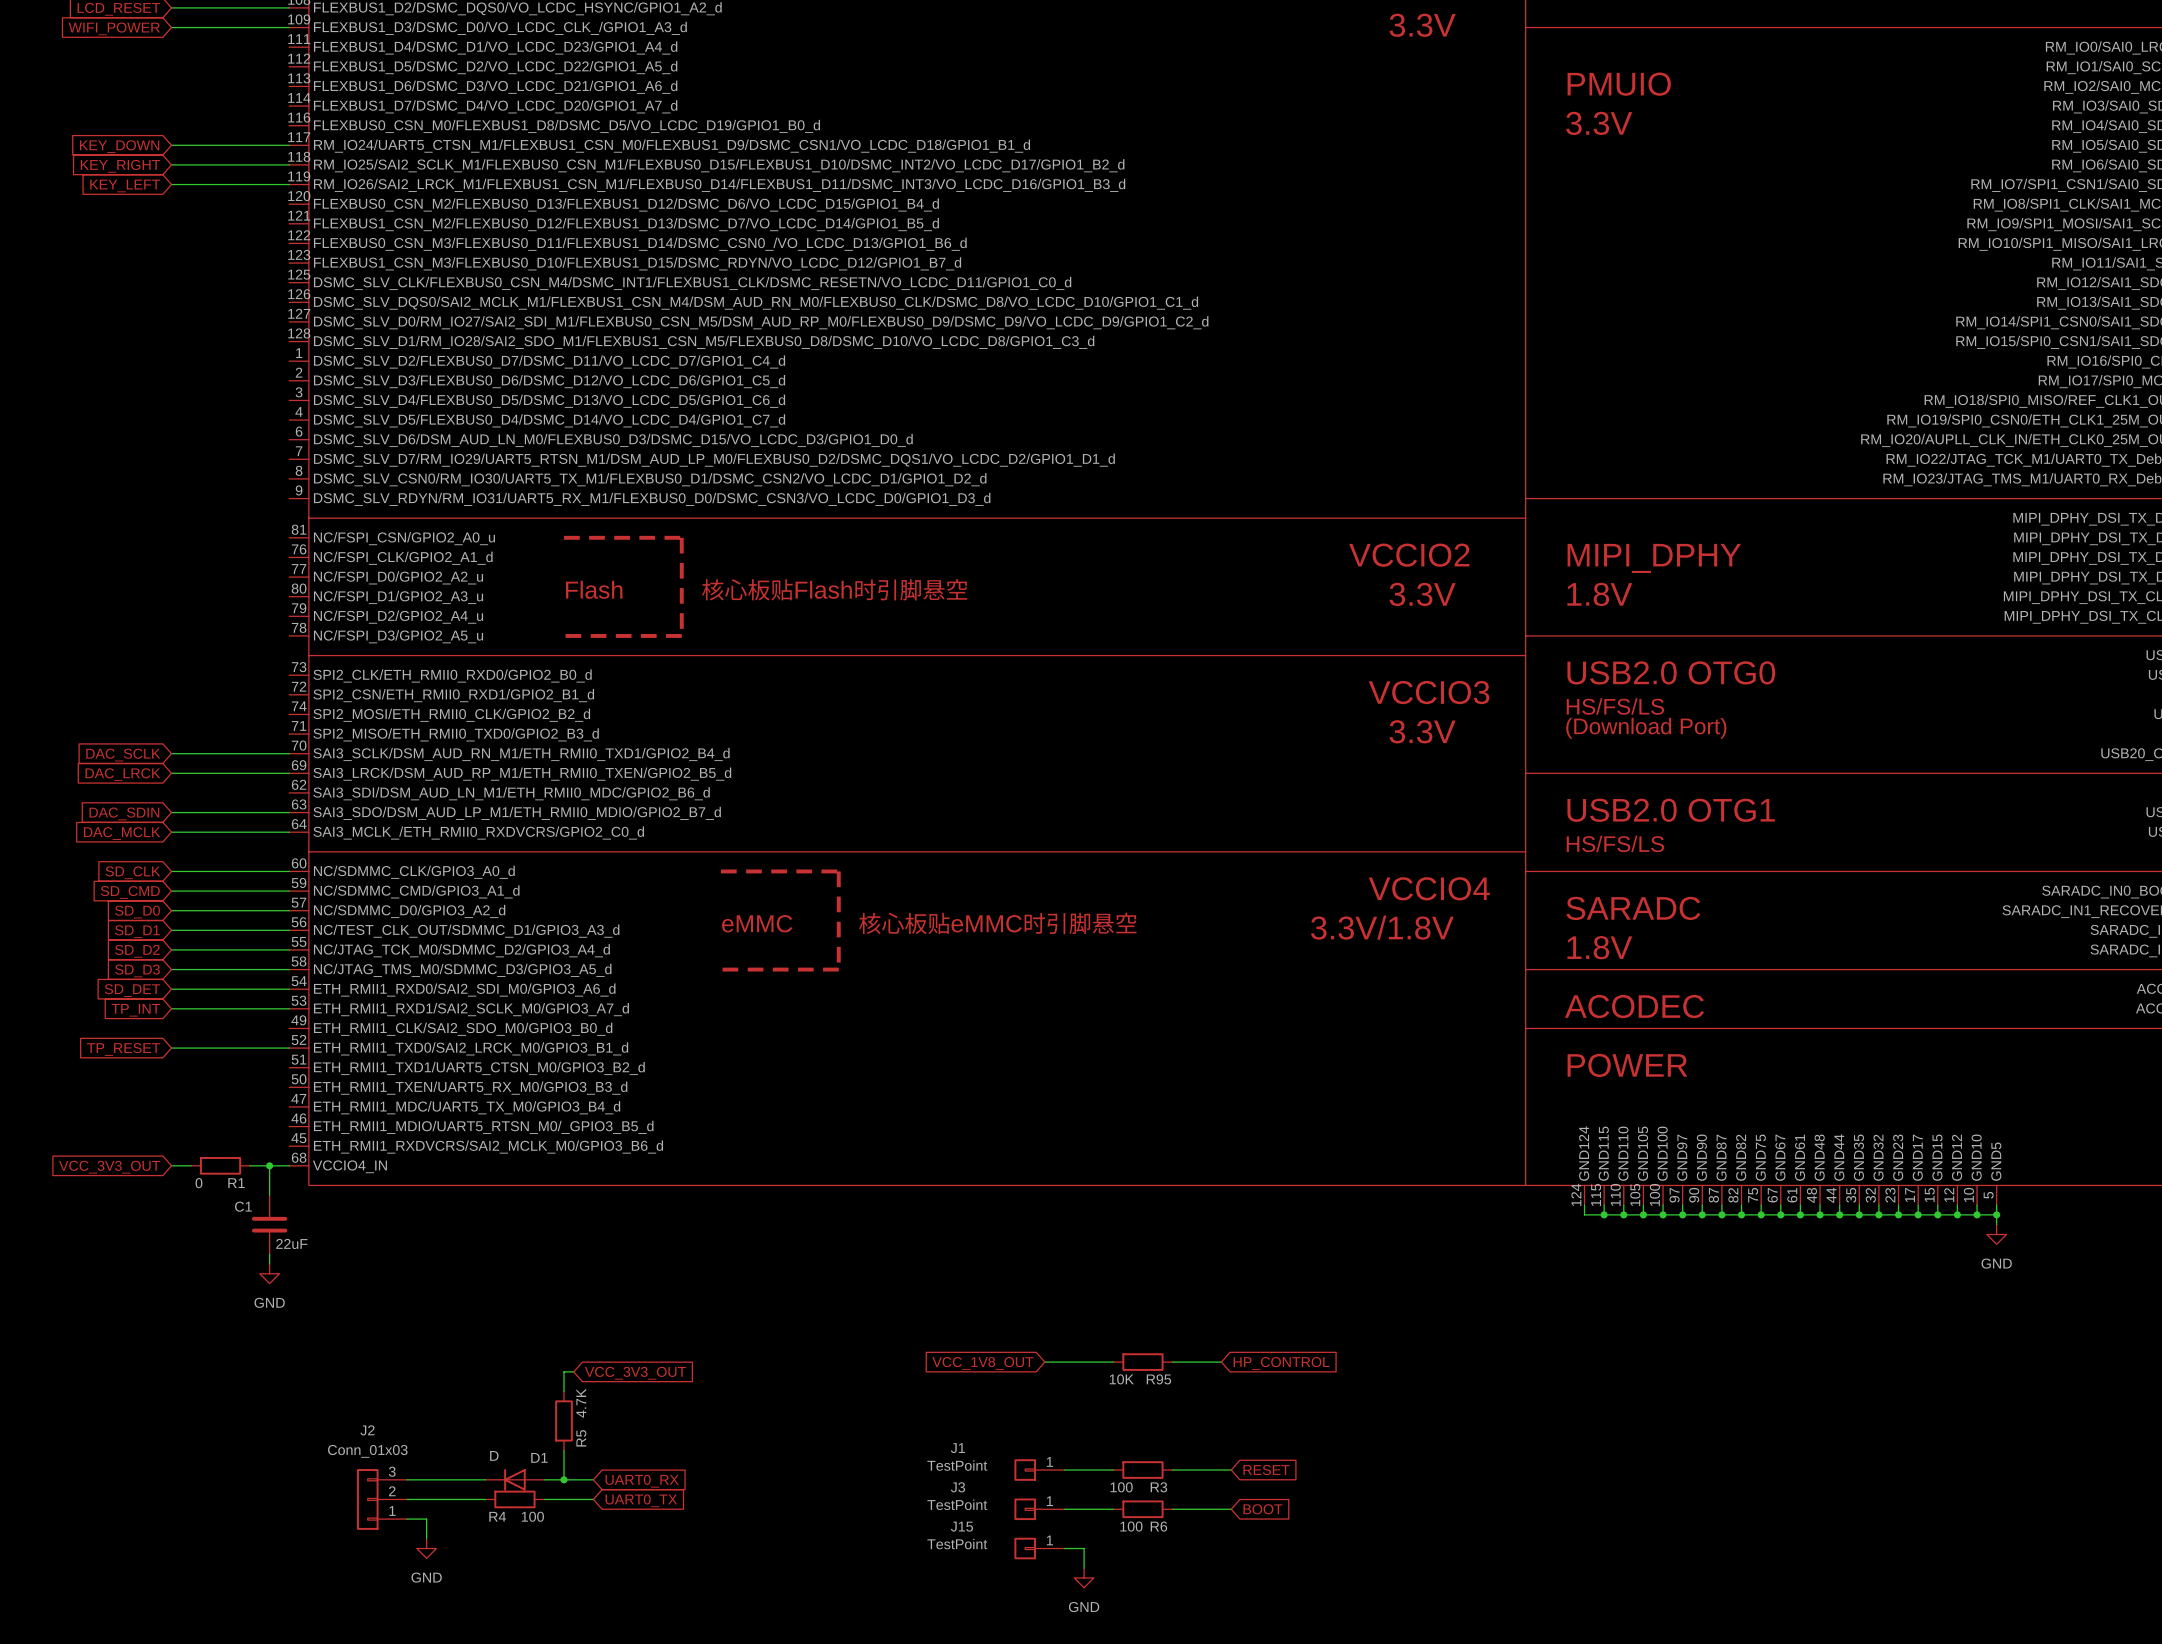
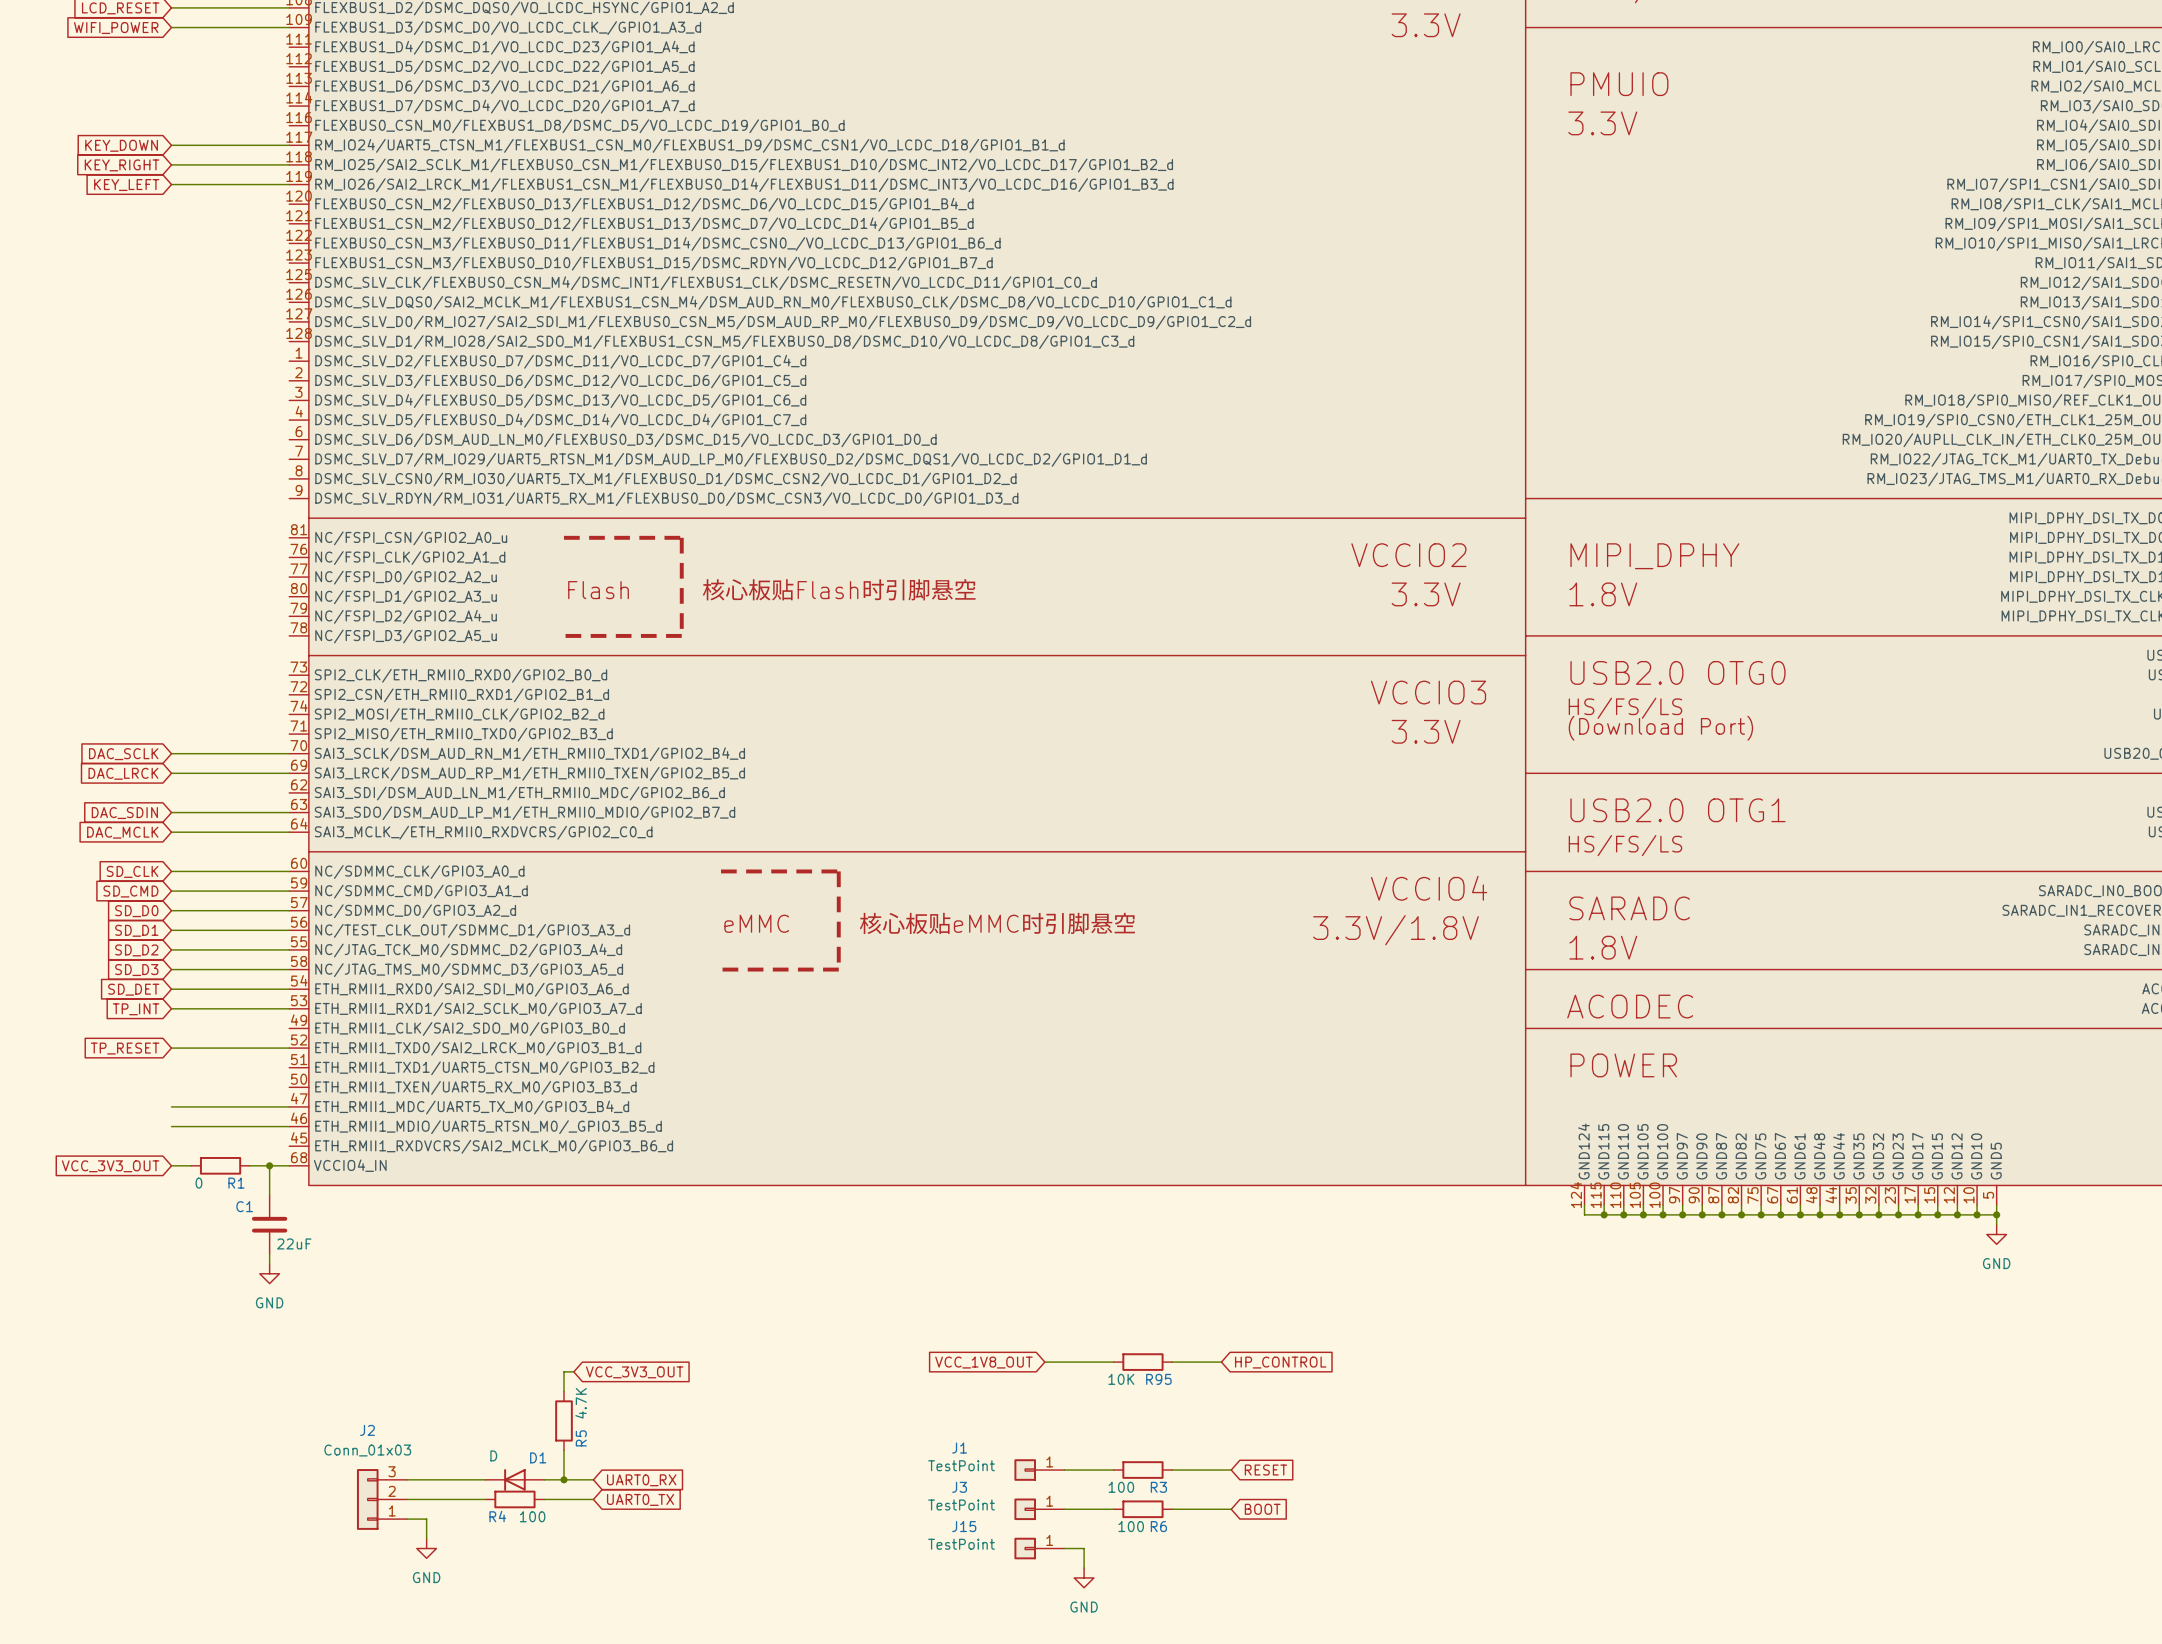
wire: none -> (171, 1106) (289, 1106)
wire: none -> (171, 1126) (289, 1126)

